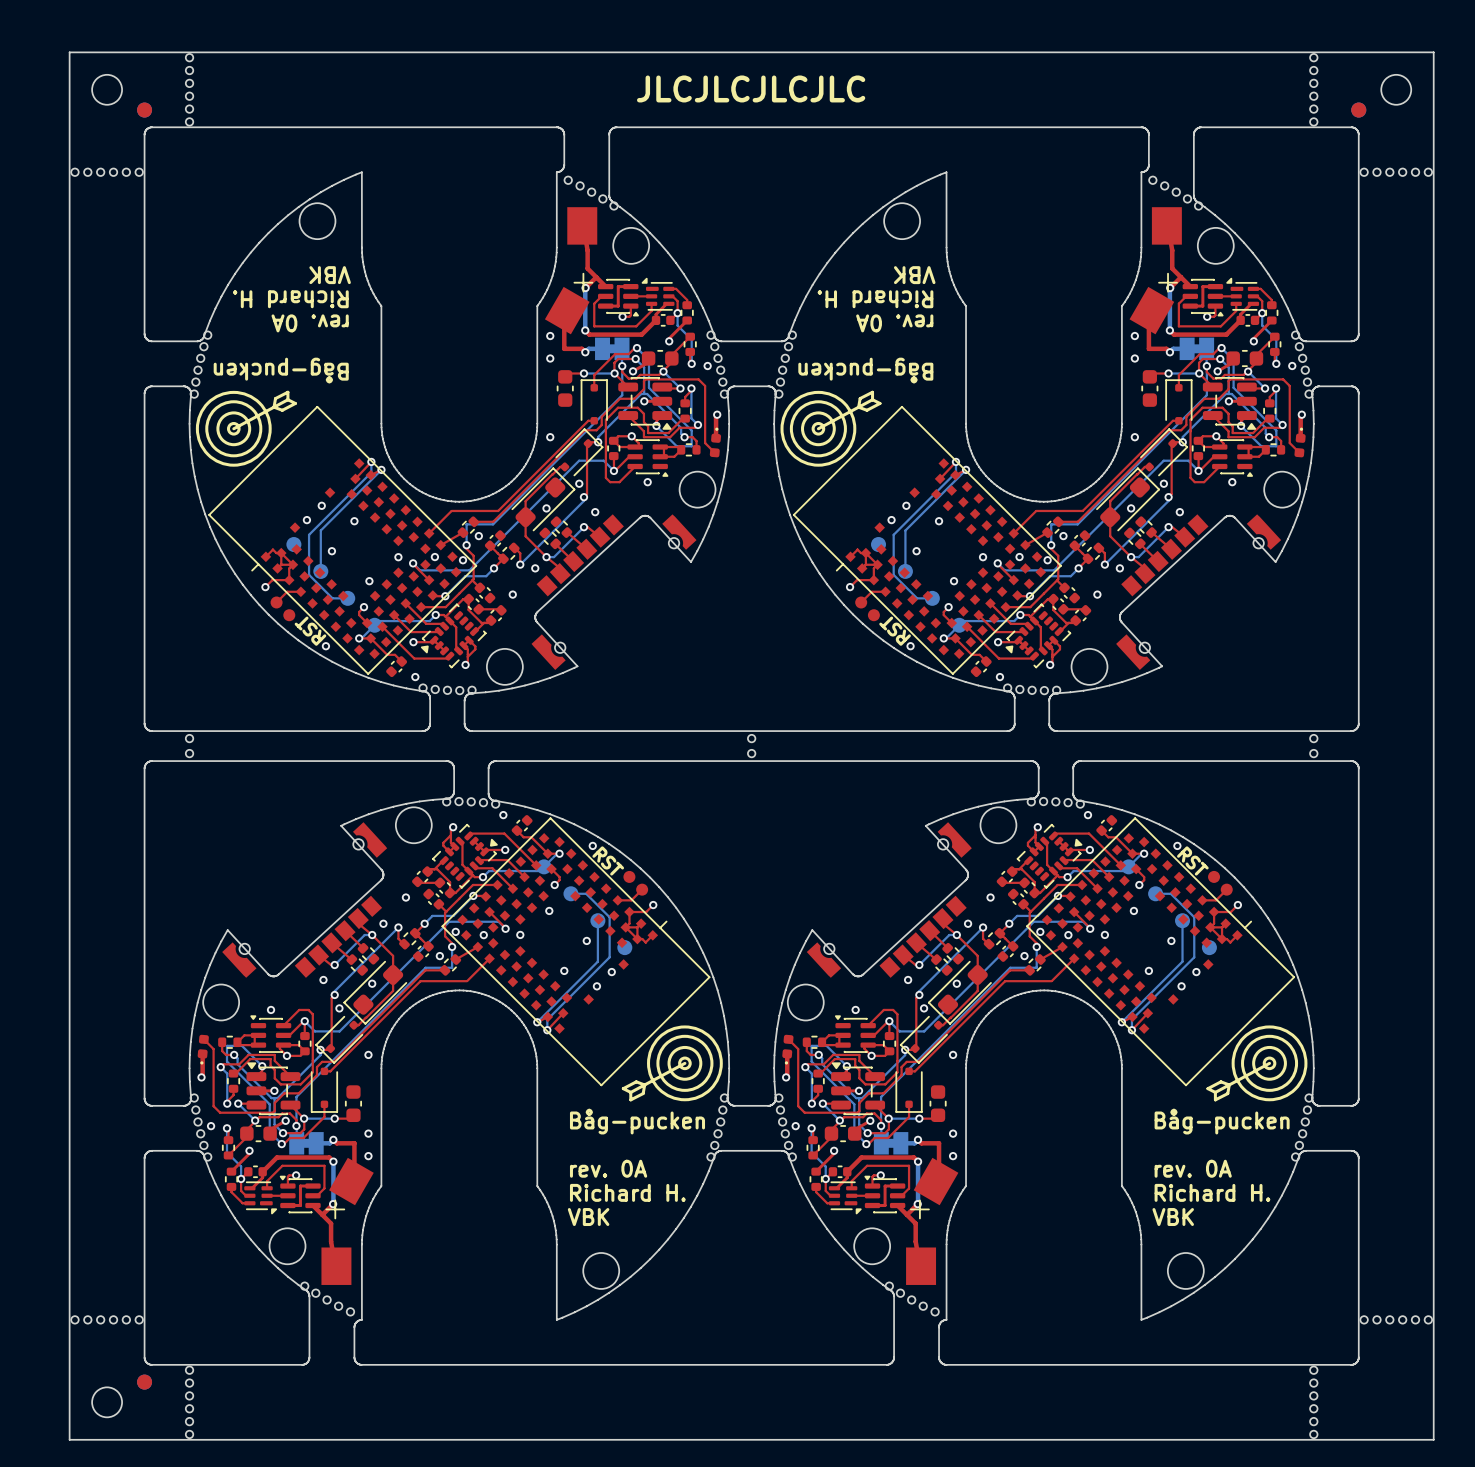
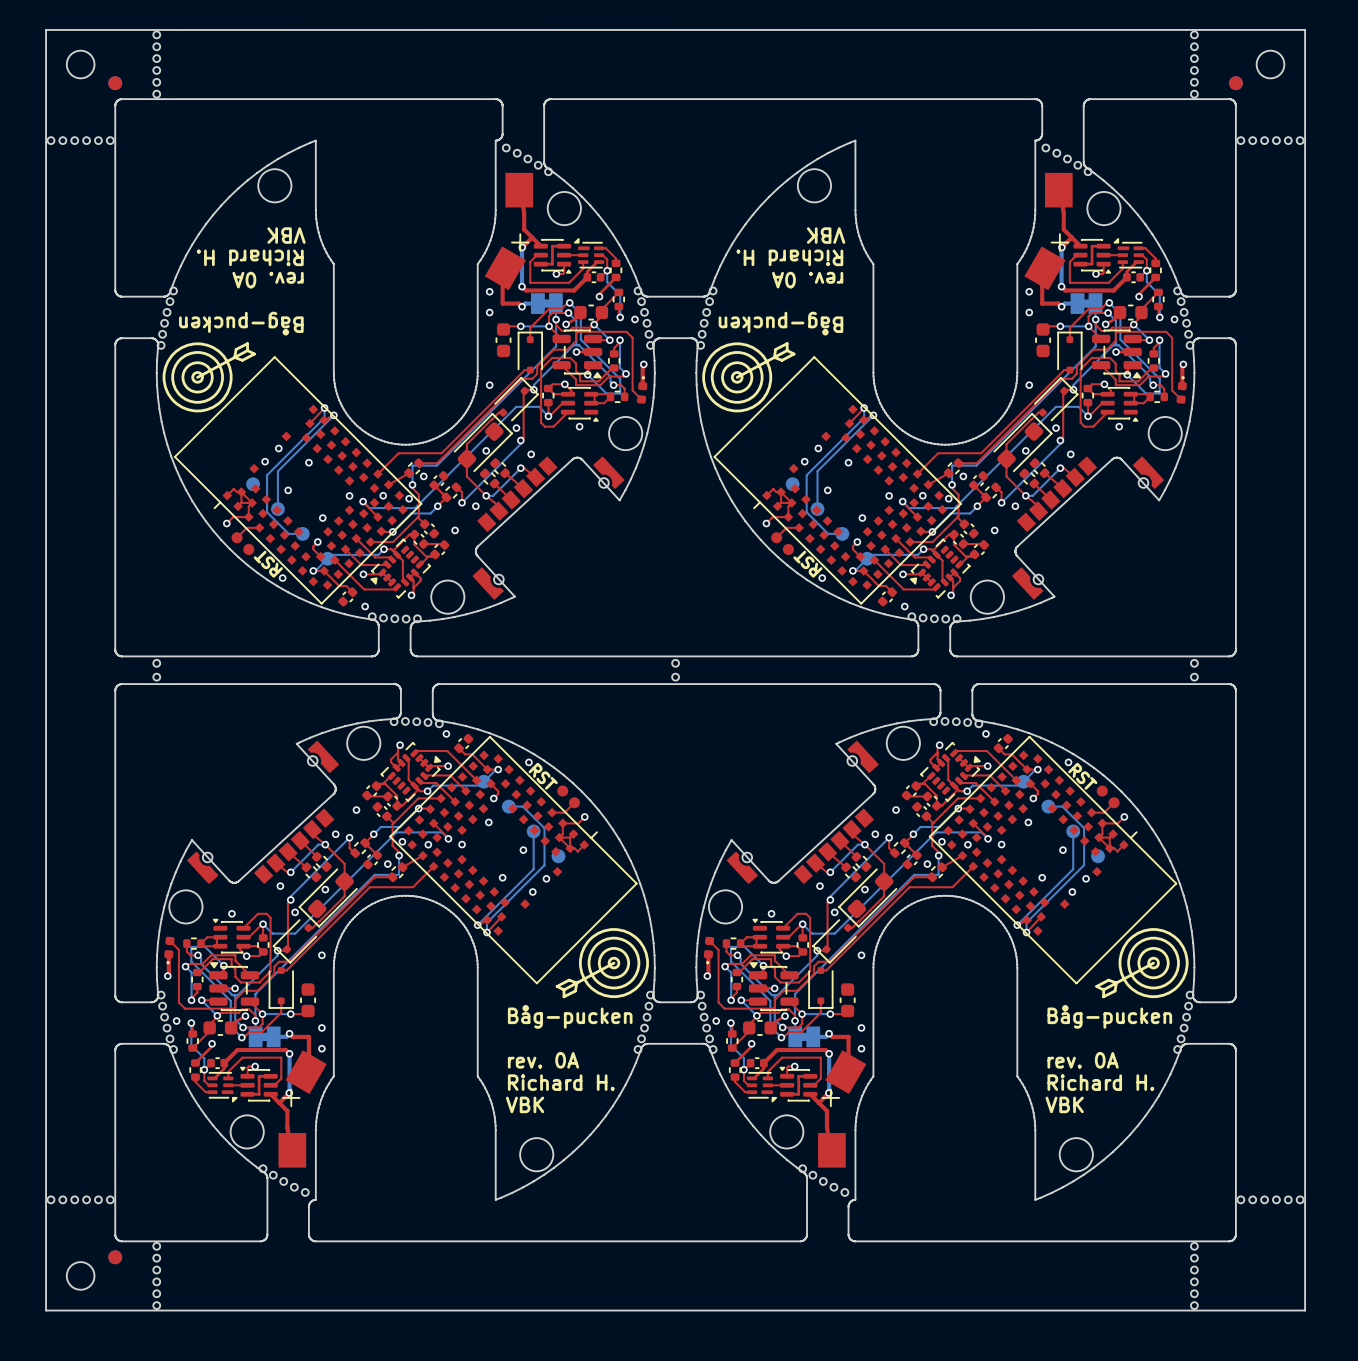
text: JLCJLCJLCJLC (751, 88) -> none

